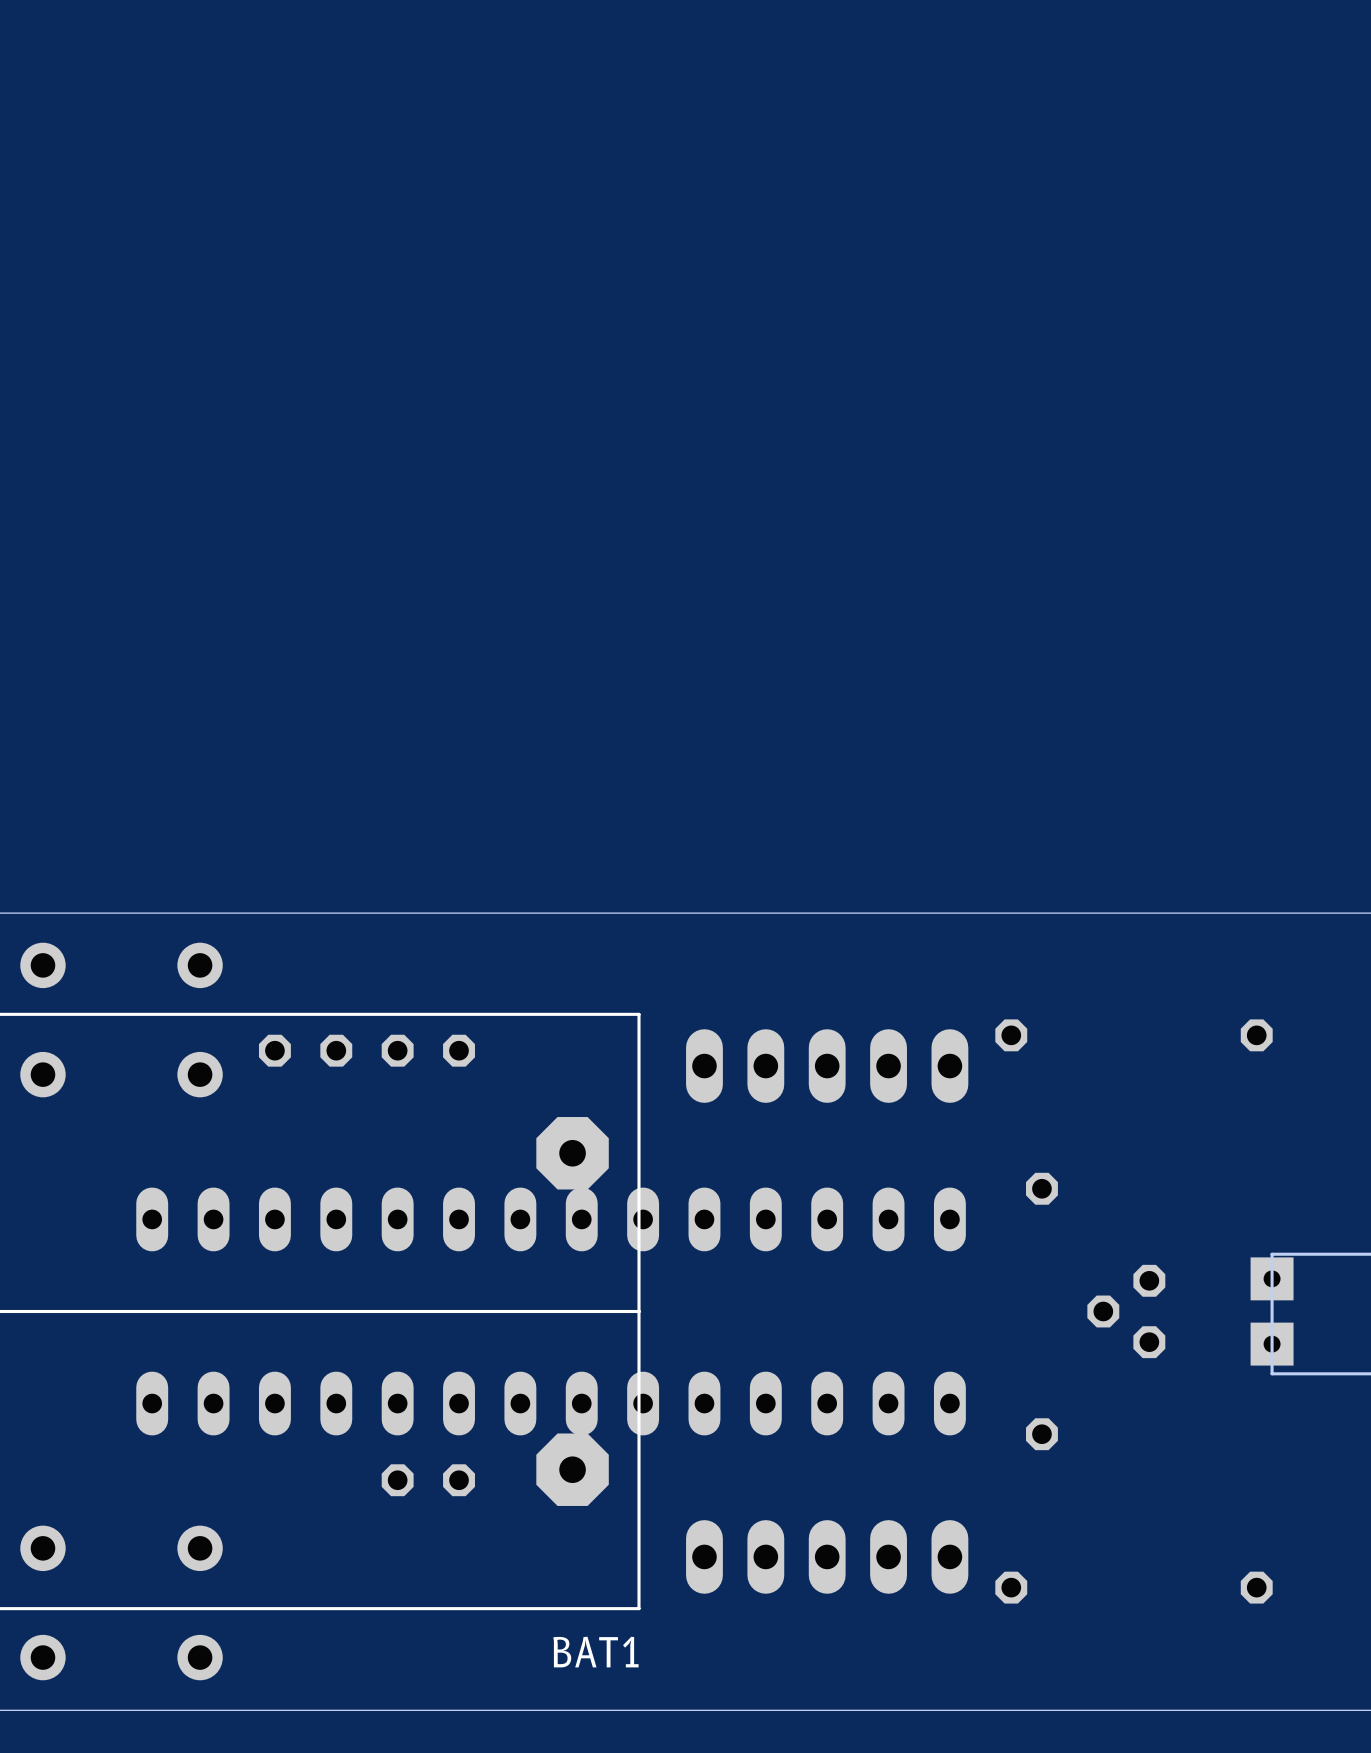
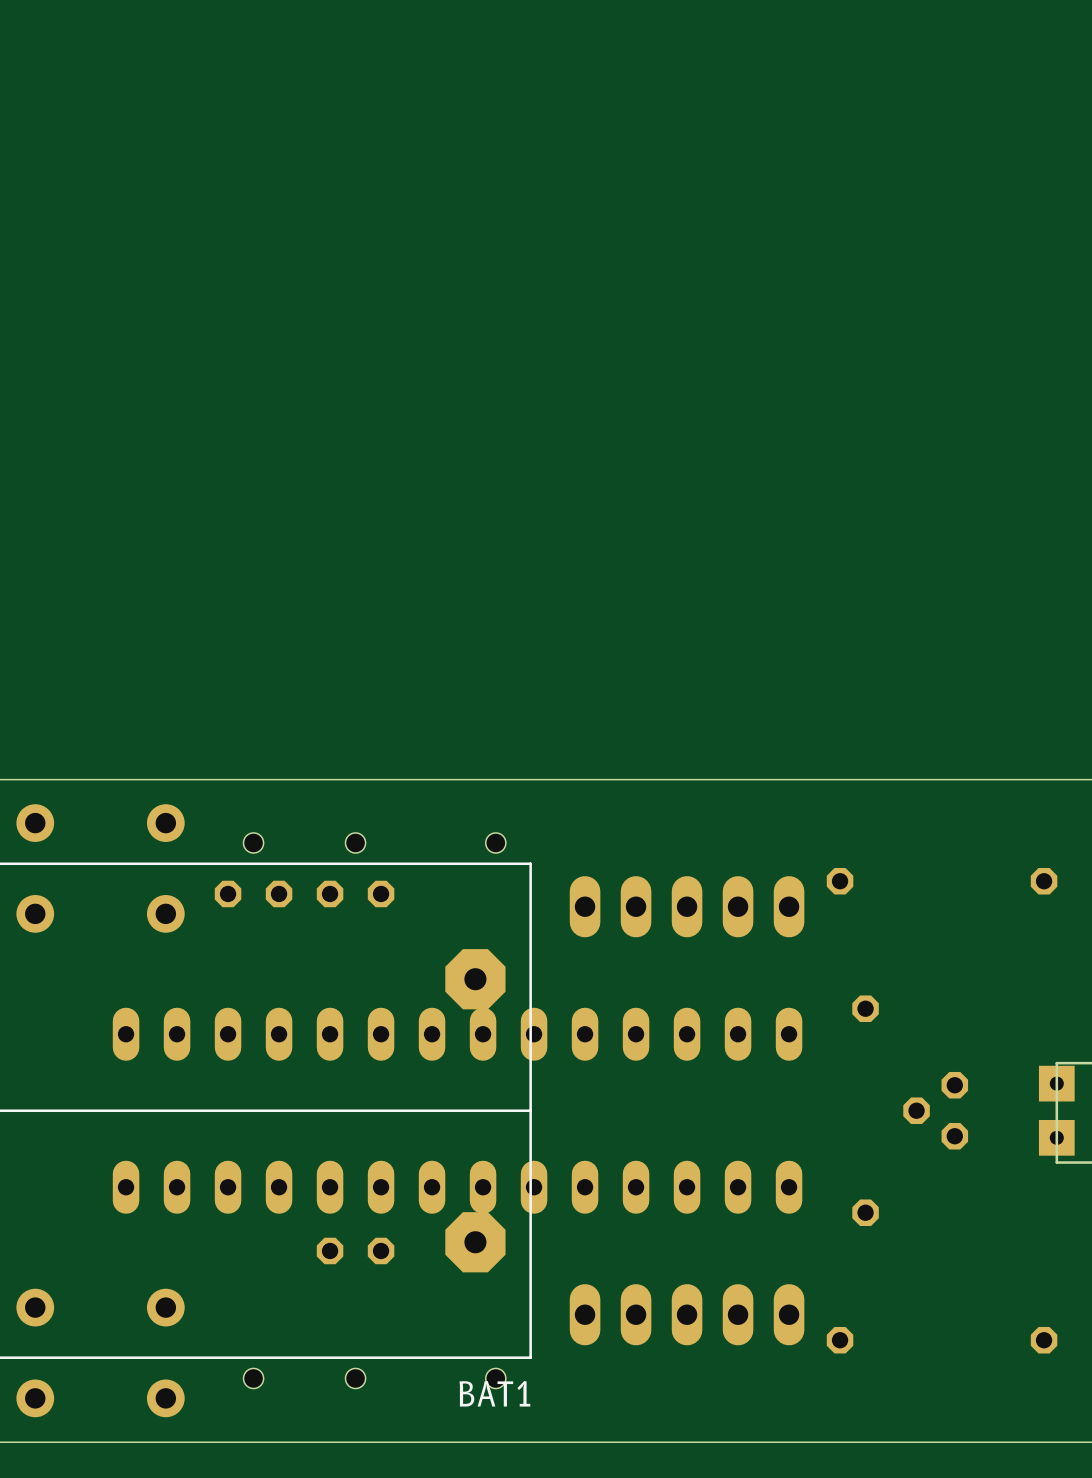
hole: none -> (253, 842)
hole: none -> (355, 842)
hole: none -> (495, 842)
hole: none -> (253, 1378)
hole: none -> (355, 1378)
hole: none -> (495, 1378)

